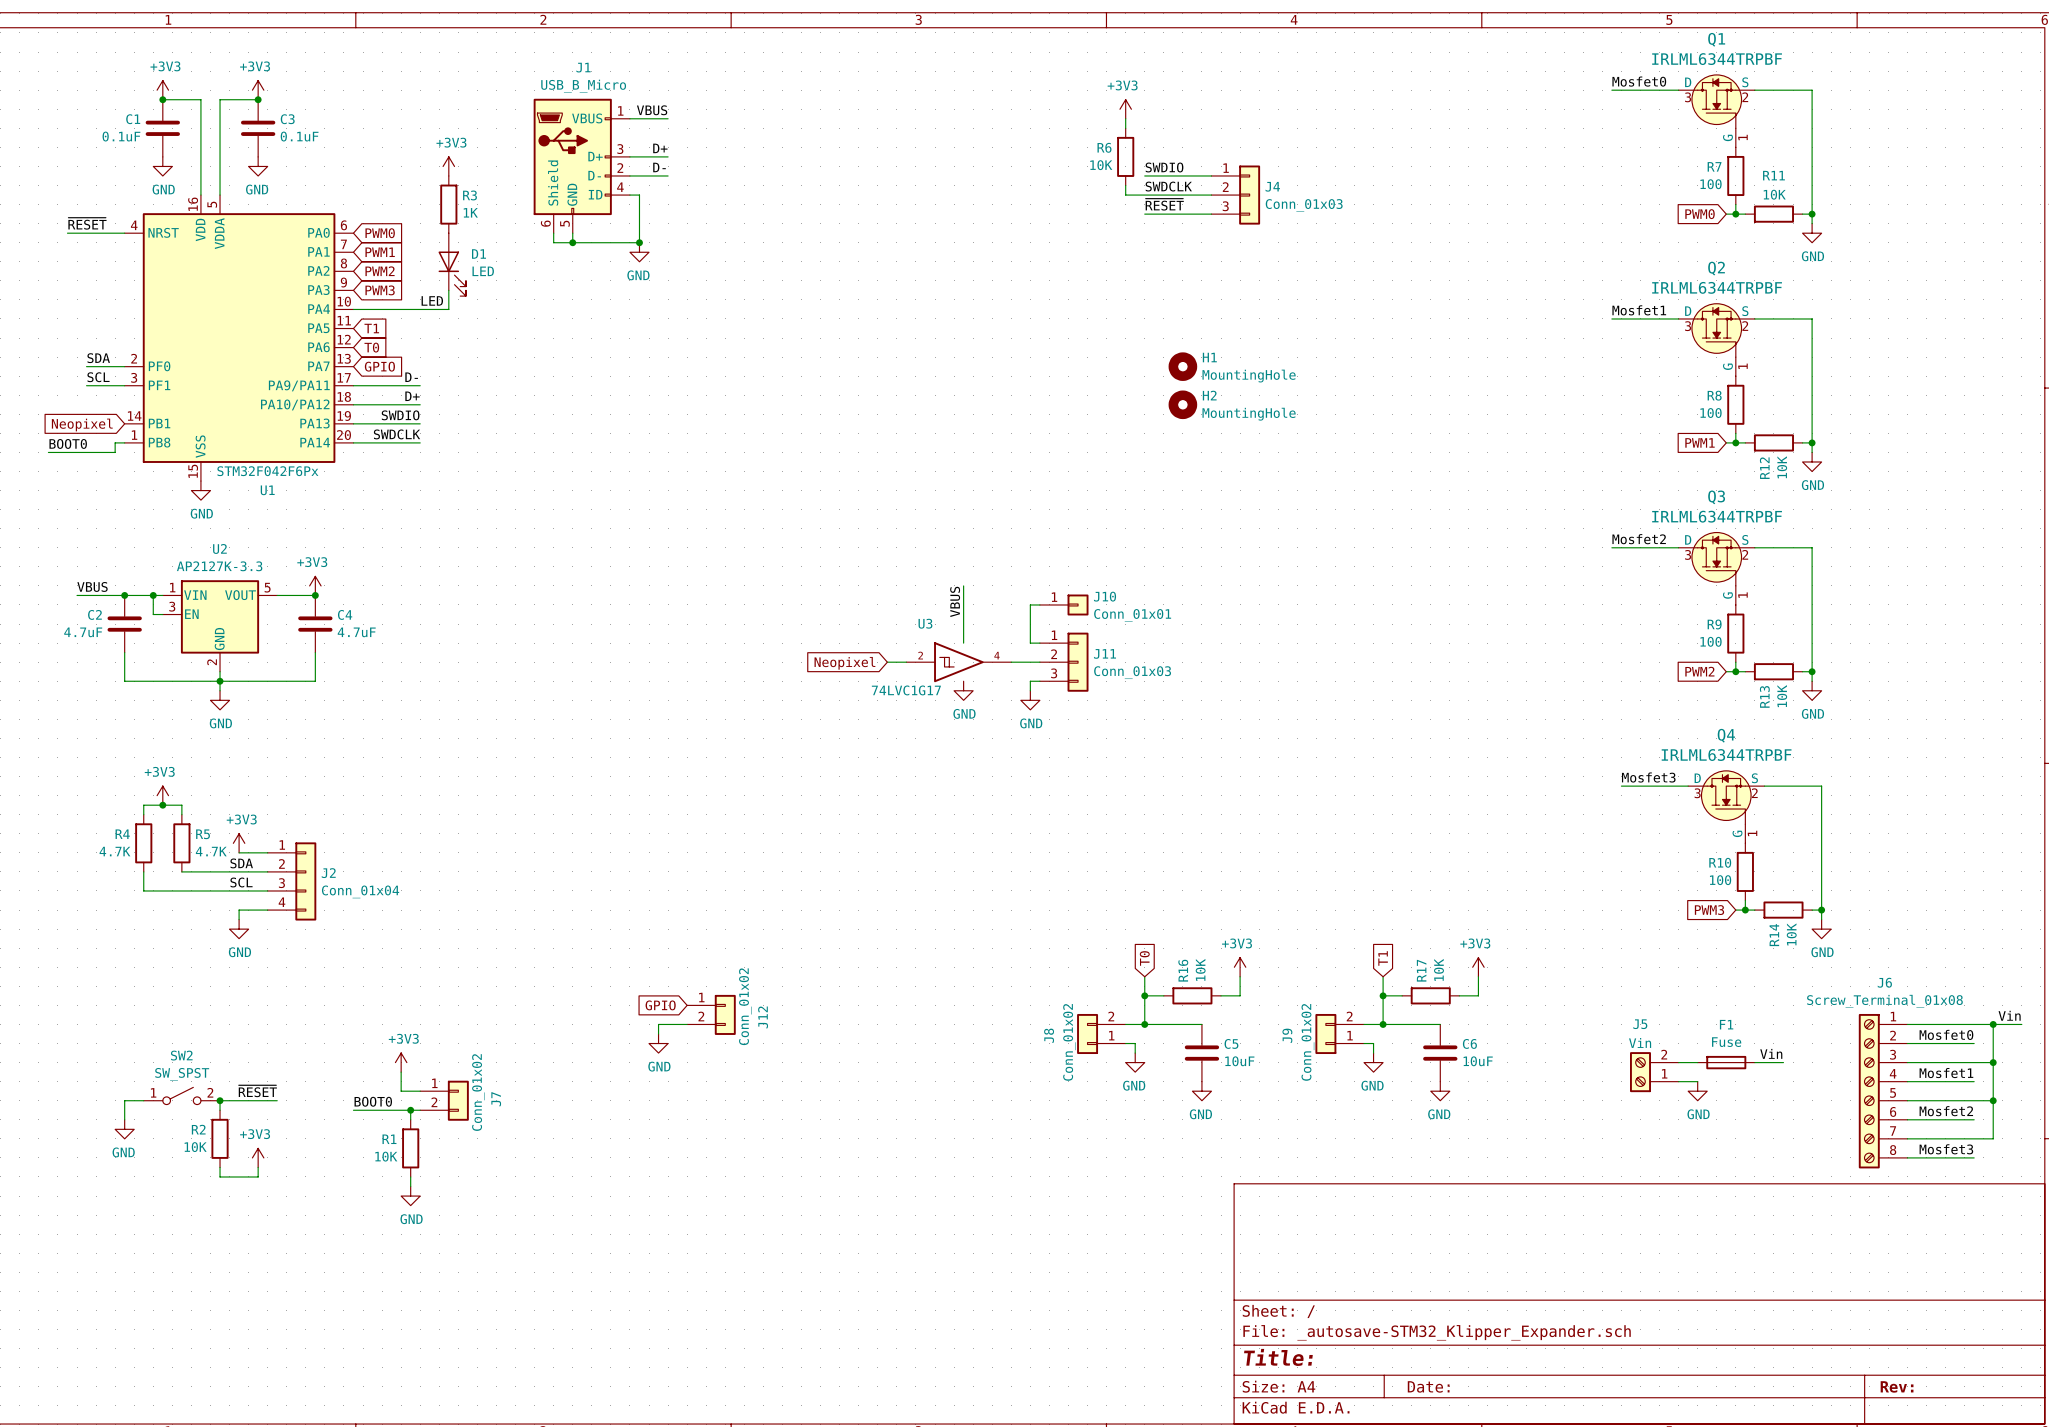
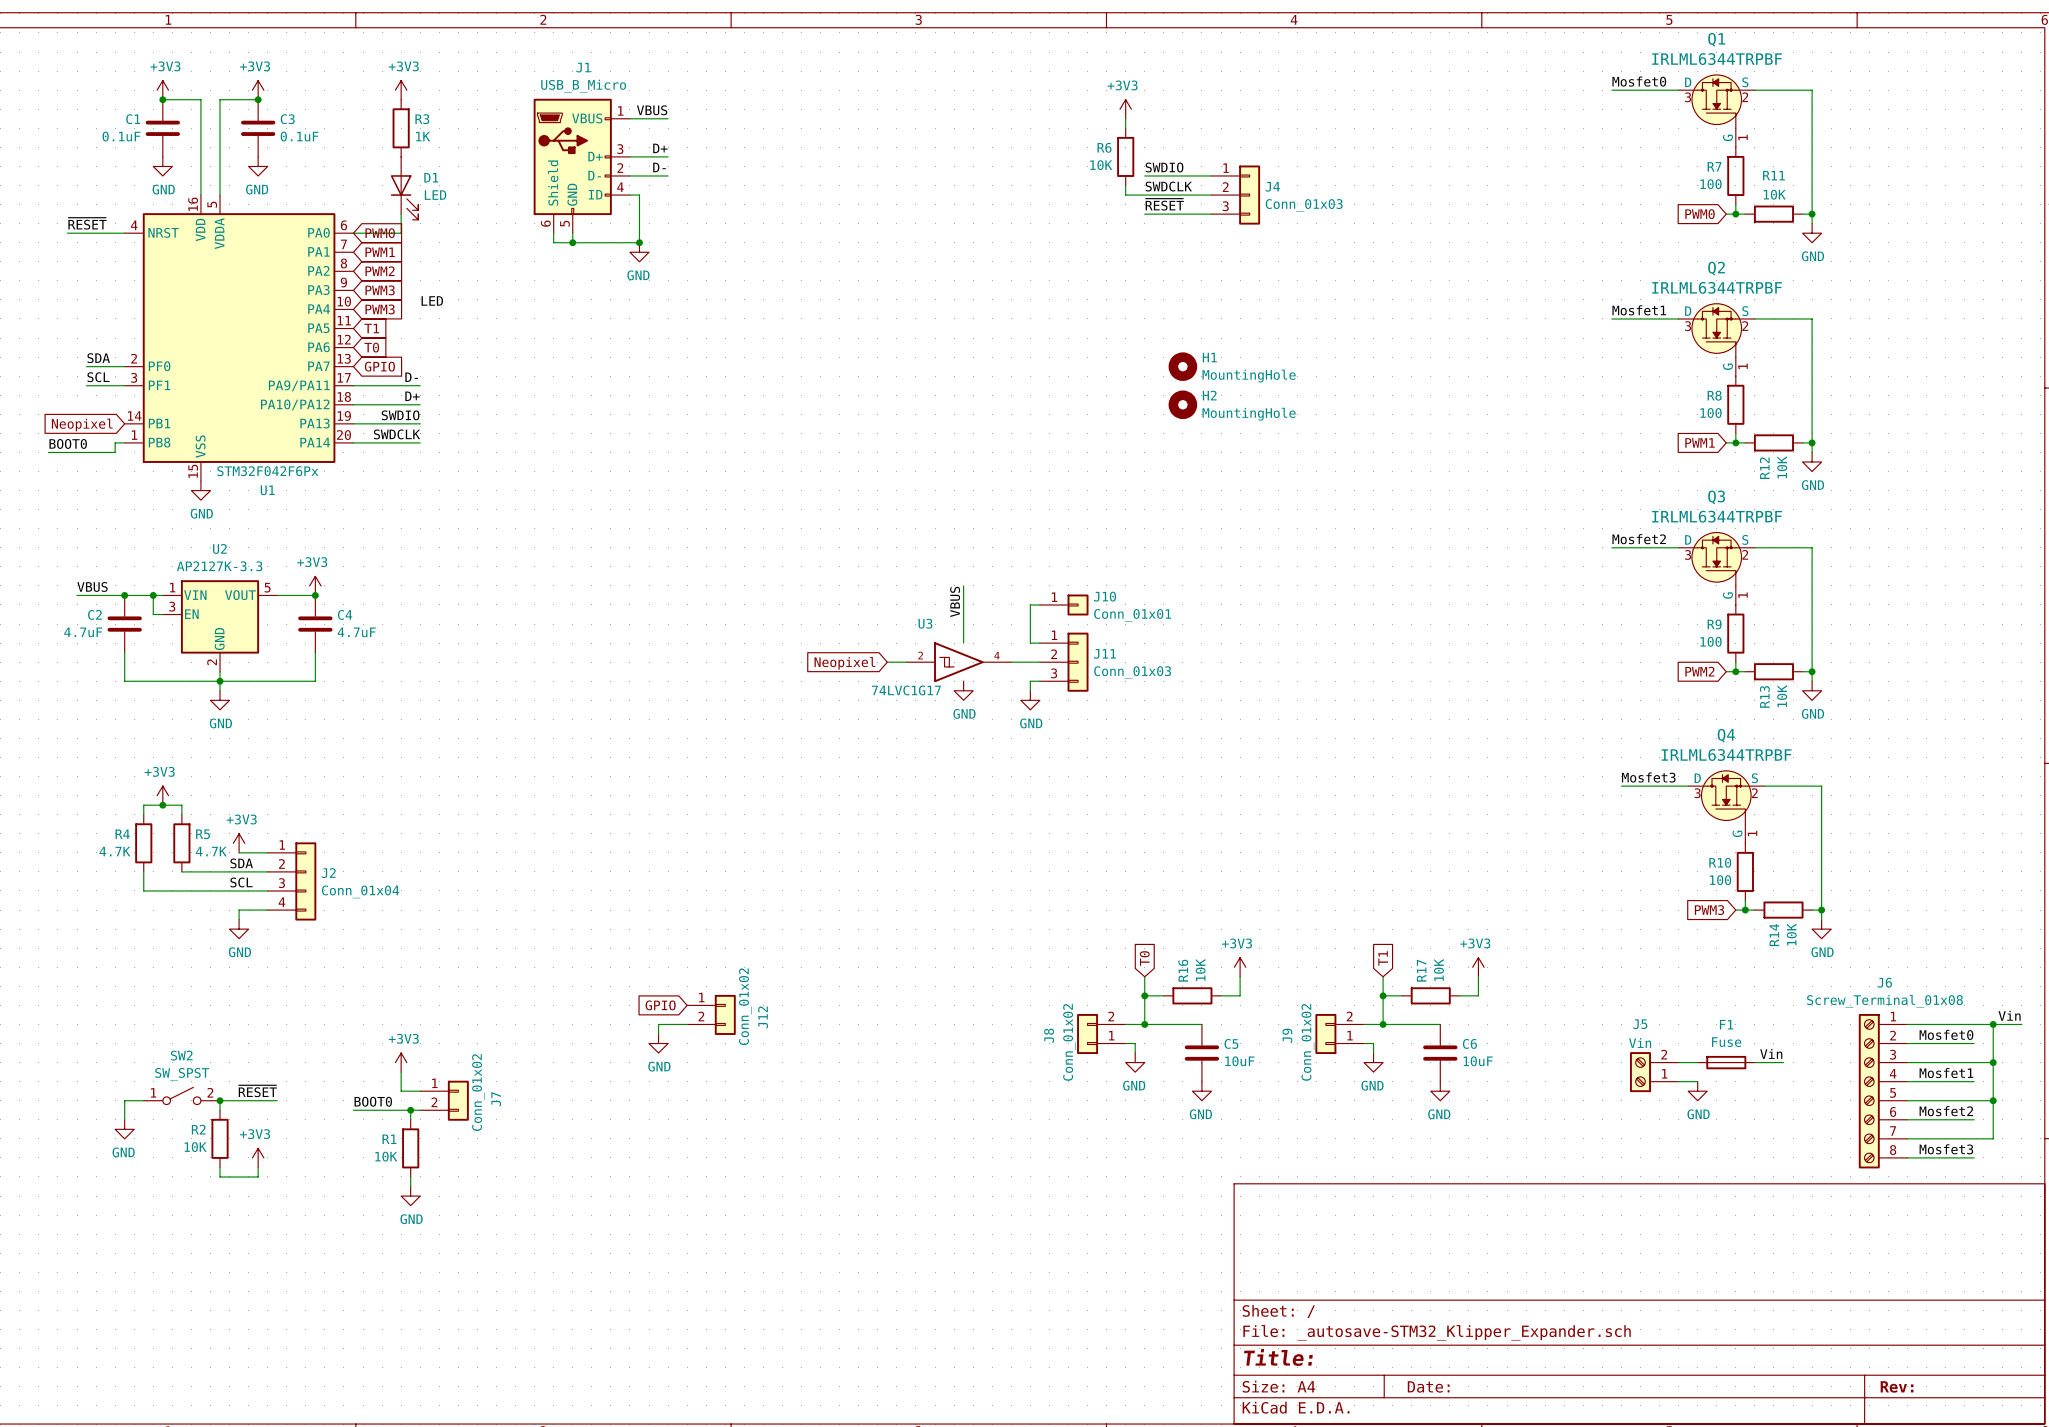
power symbol position: +3V3 (448, 166) -> +3V3 (401, 90)
R3 position: (448, 204) -> (401, 128)
wire: none -> (401, 214) (401, 233) (353, 233)
D1 position: (452, 264) -> (404, 188)
wire: (448, 290) (448, 309) (353, 309) -> none
global label: none -> PWM3 (380, 309)

